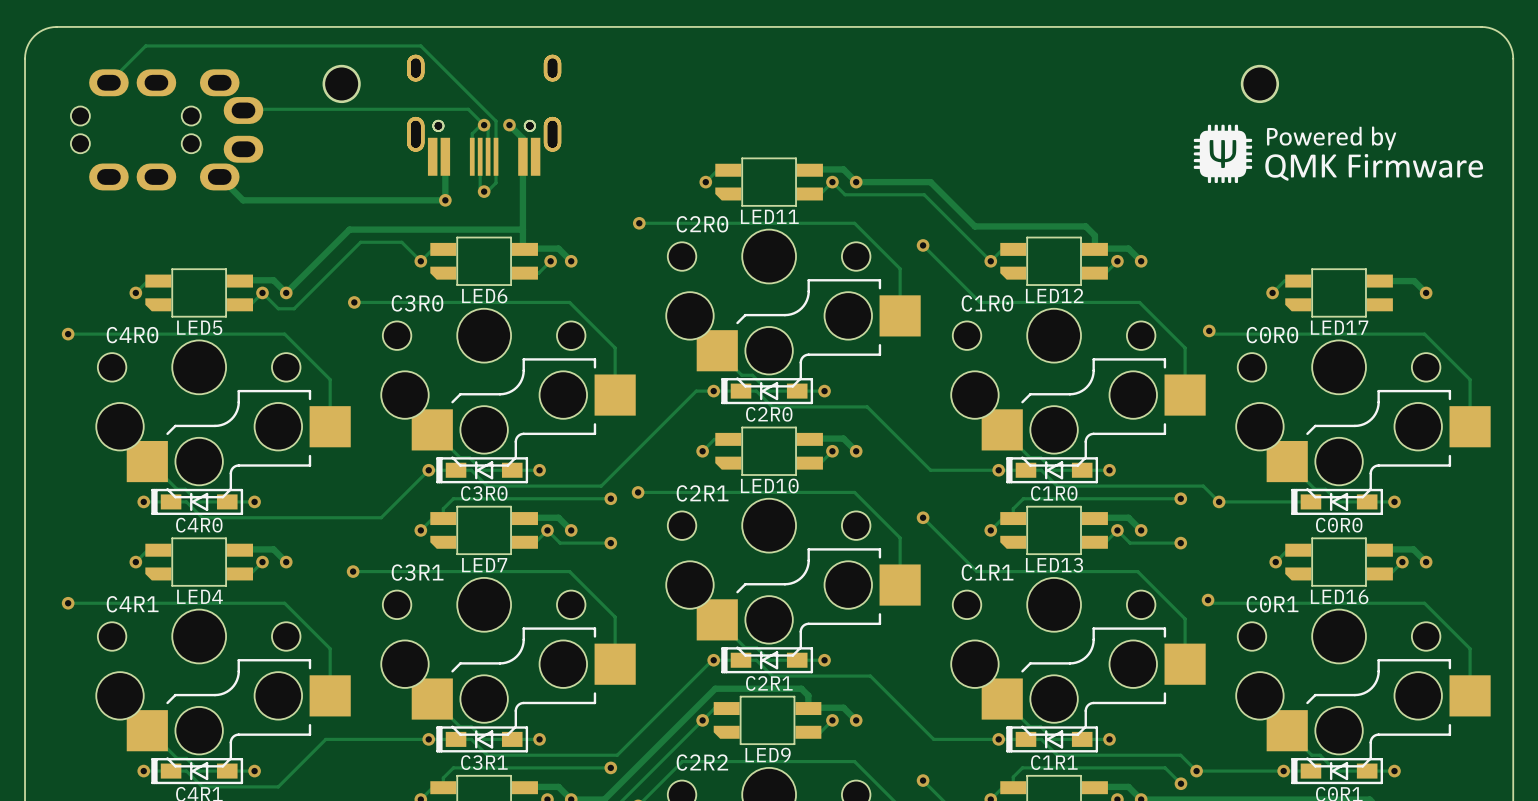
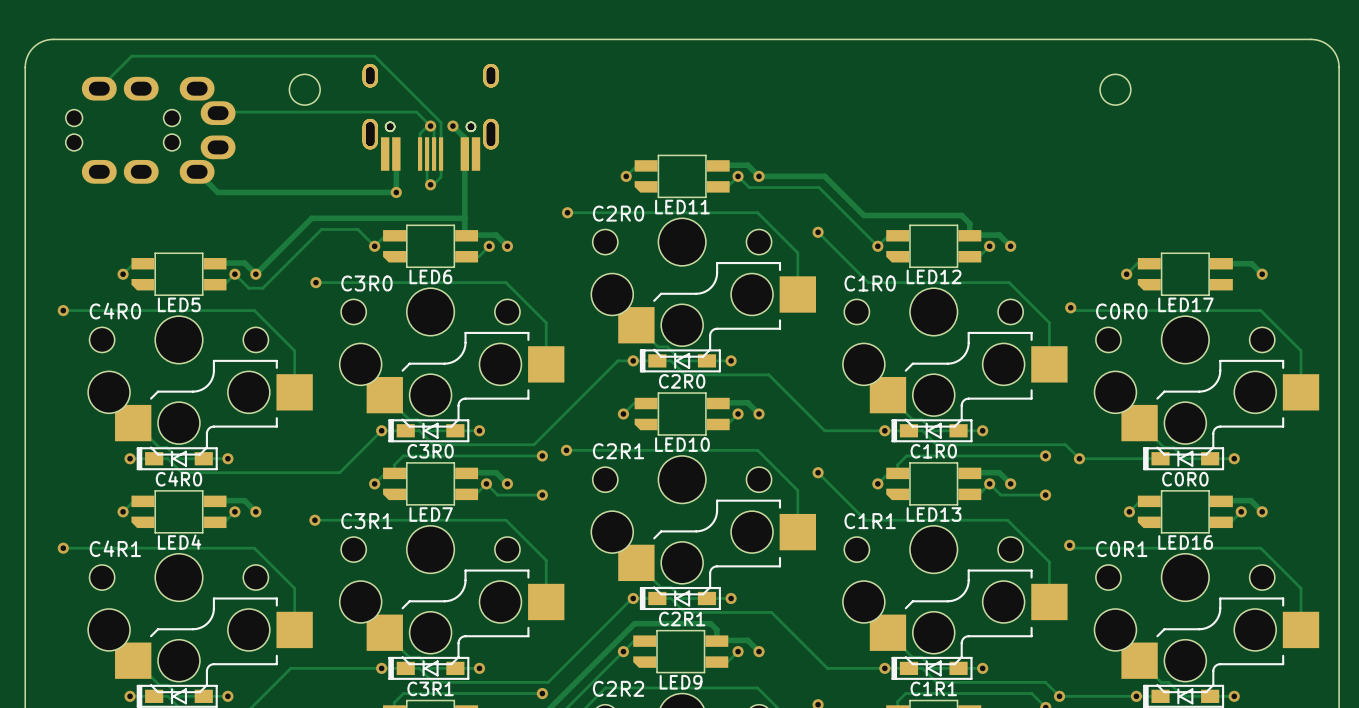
part: (341, 83) -> none
part: (1259, 83) -> none
drawing: [1193, 124, 1484, 184] -> none

